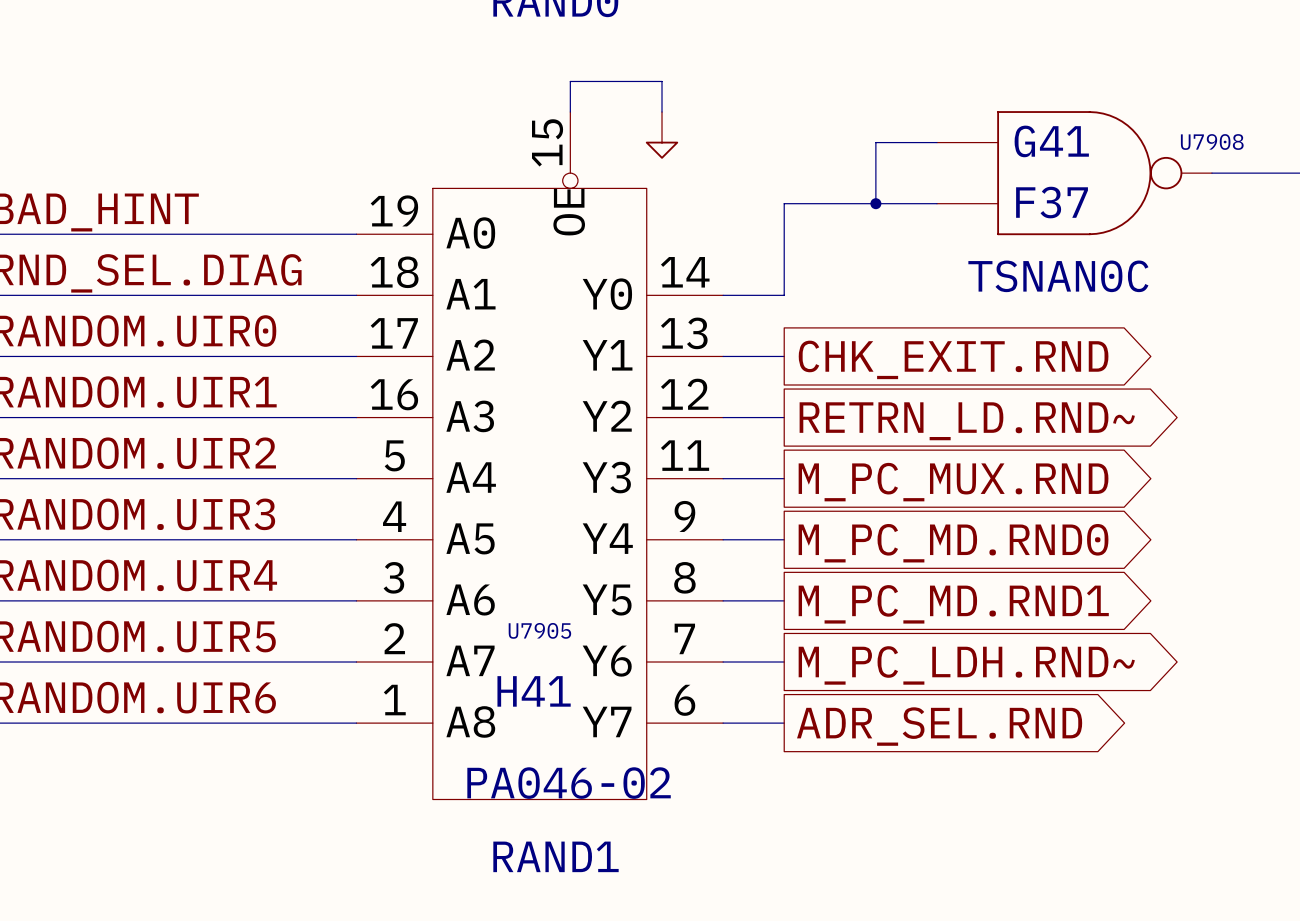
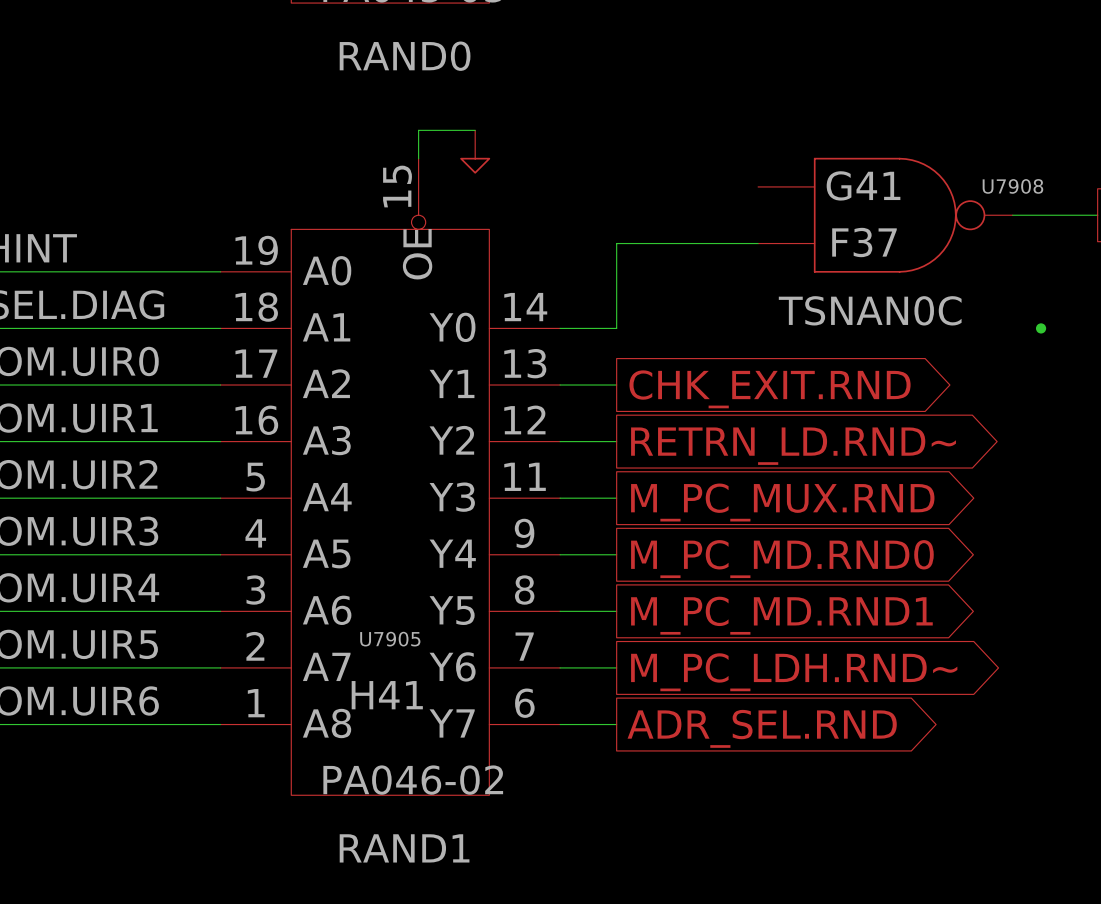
wire: (631, 81) (662, 81) (662, 112) -> none
power symbol position: (662, 135) -> (475, 152)
wire: (936, 142) (875, 142) (875, 203) -> none
junction: (875, 203) -> none
junction: none -> (1041, 328)

